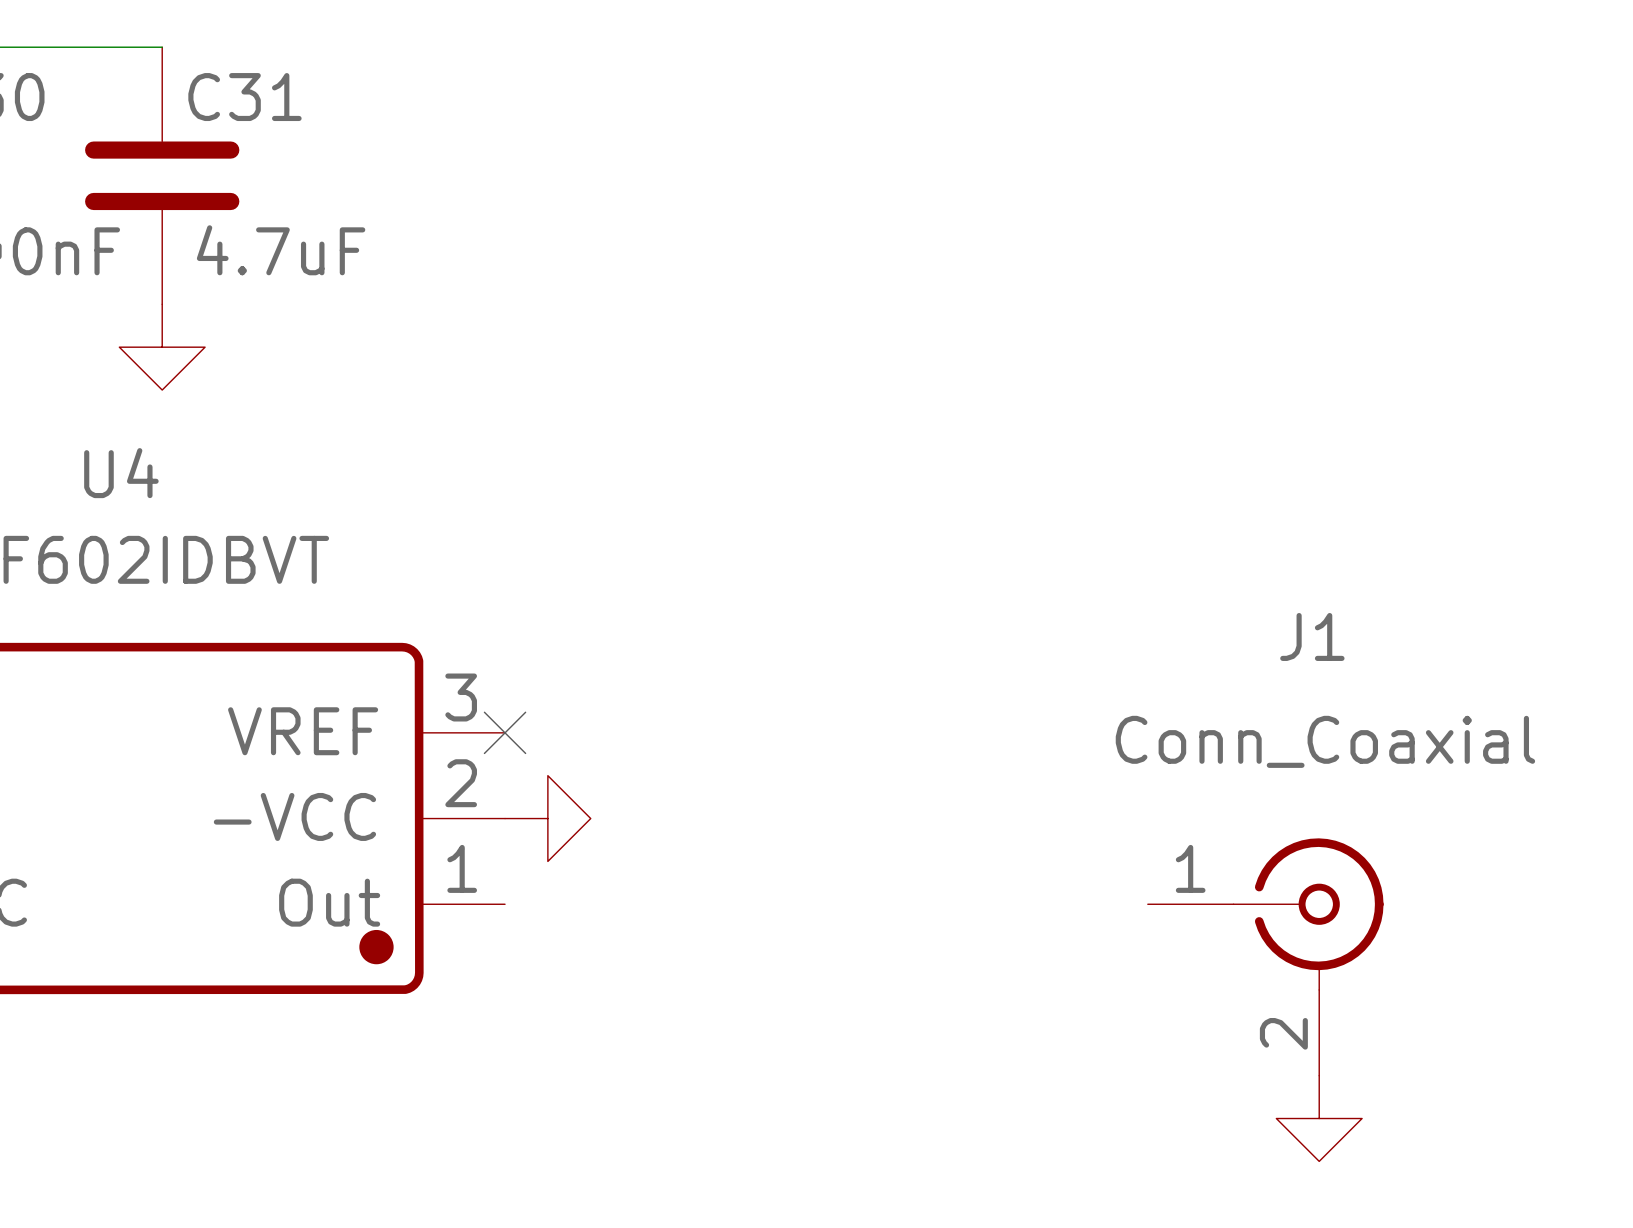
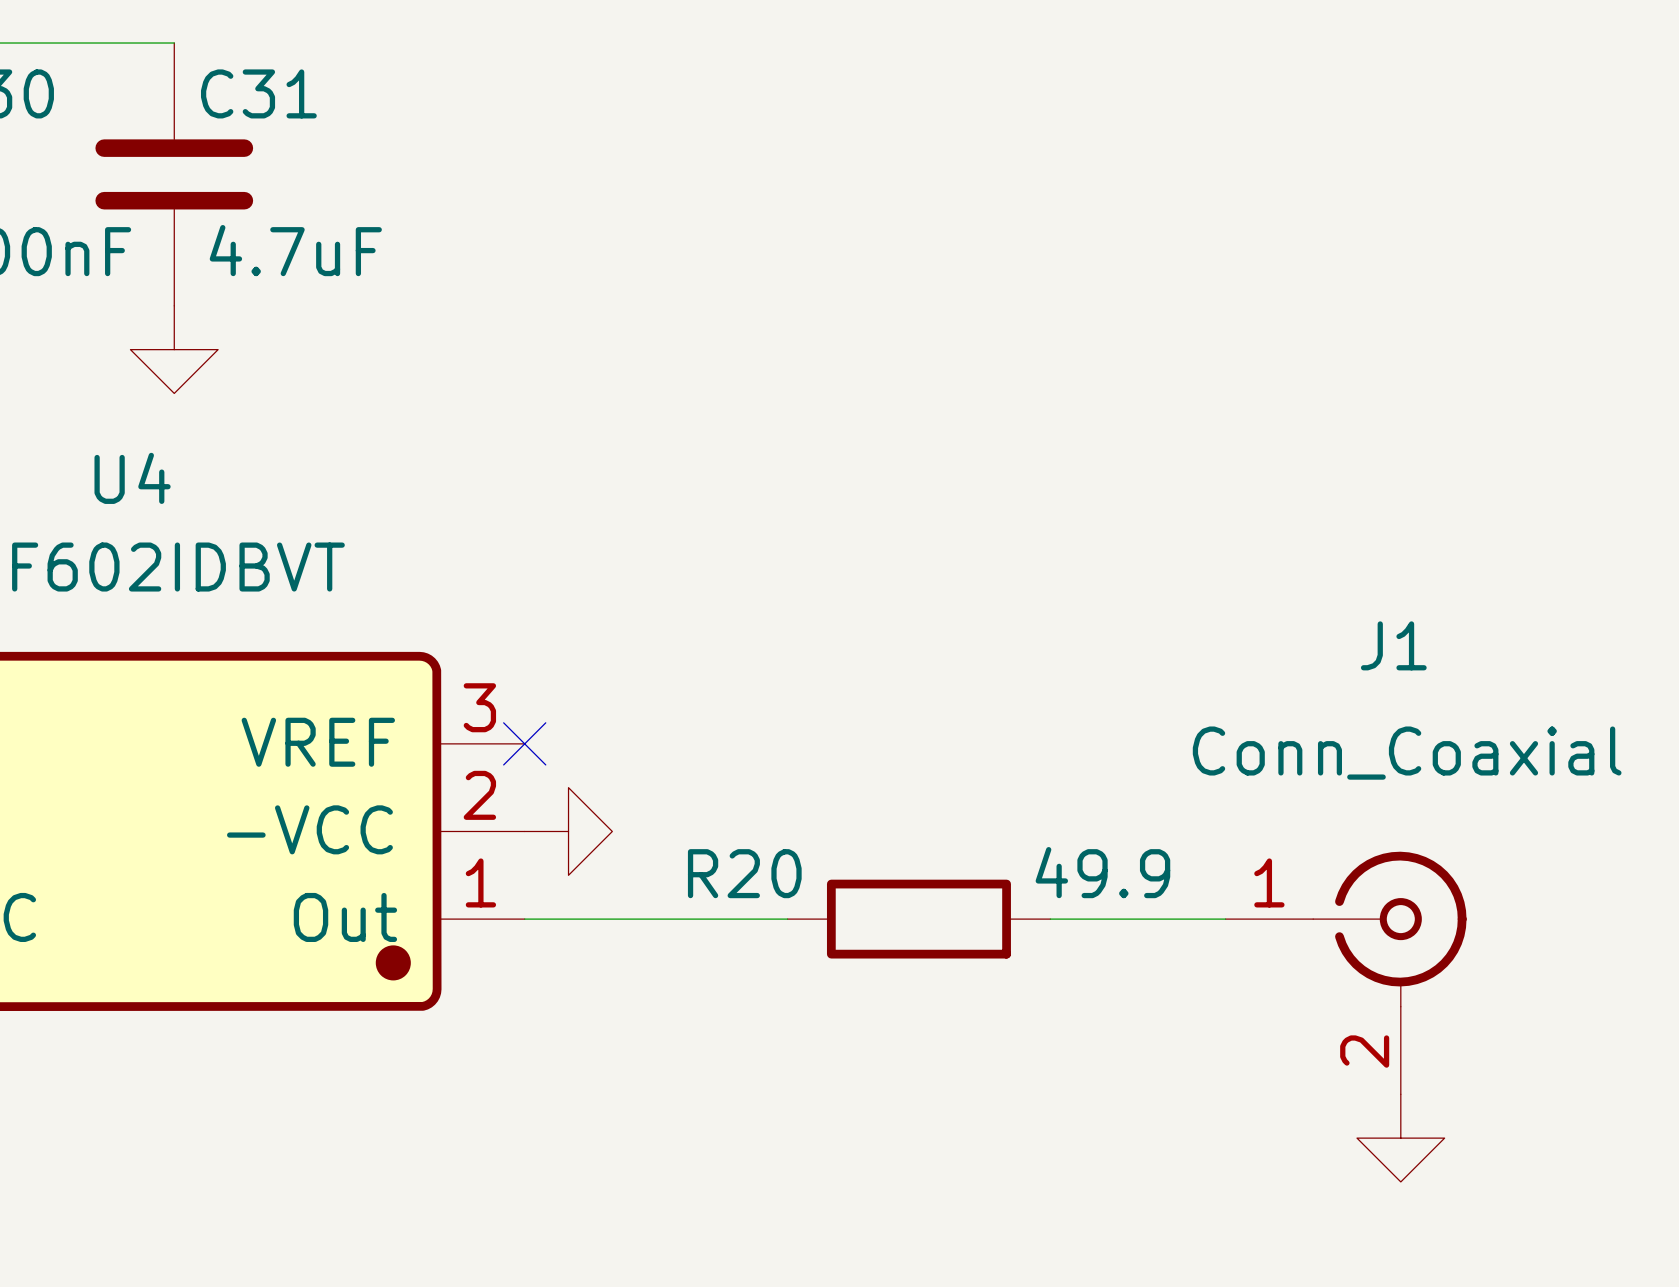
wire: none -> (524, 919) (787, 919)
R20: none -> 49.9 (918, 919)
wire: none -> (1050, 919) (1225, 919)
J1 position: (1265, 957) -> (1346, 973)
power symbol position: (1319, 1118) -> (1400, 1138)

